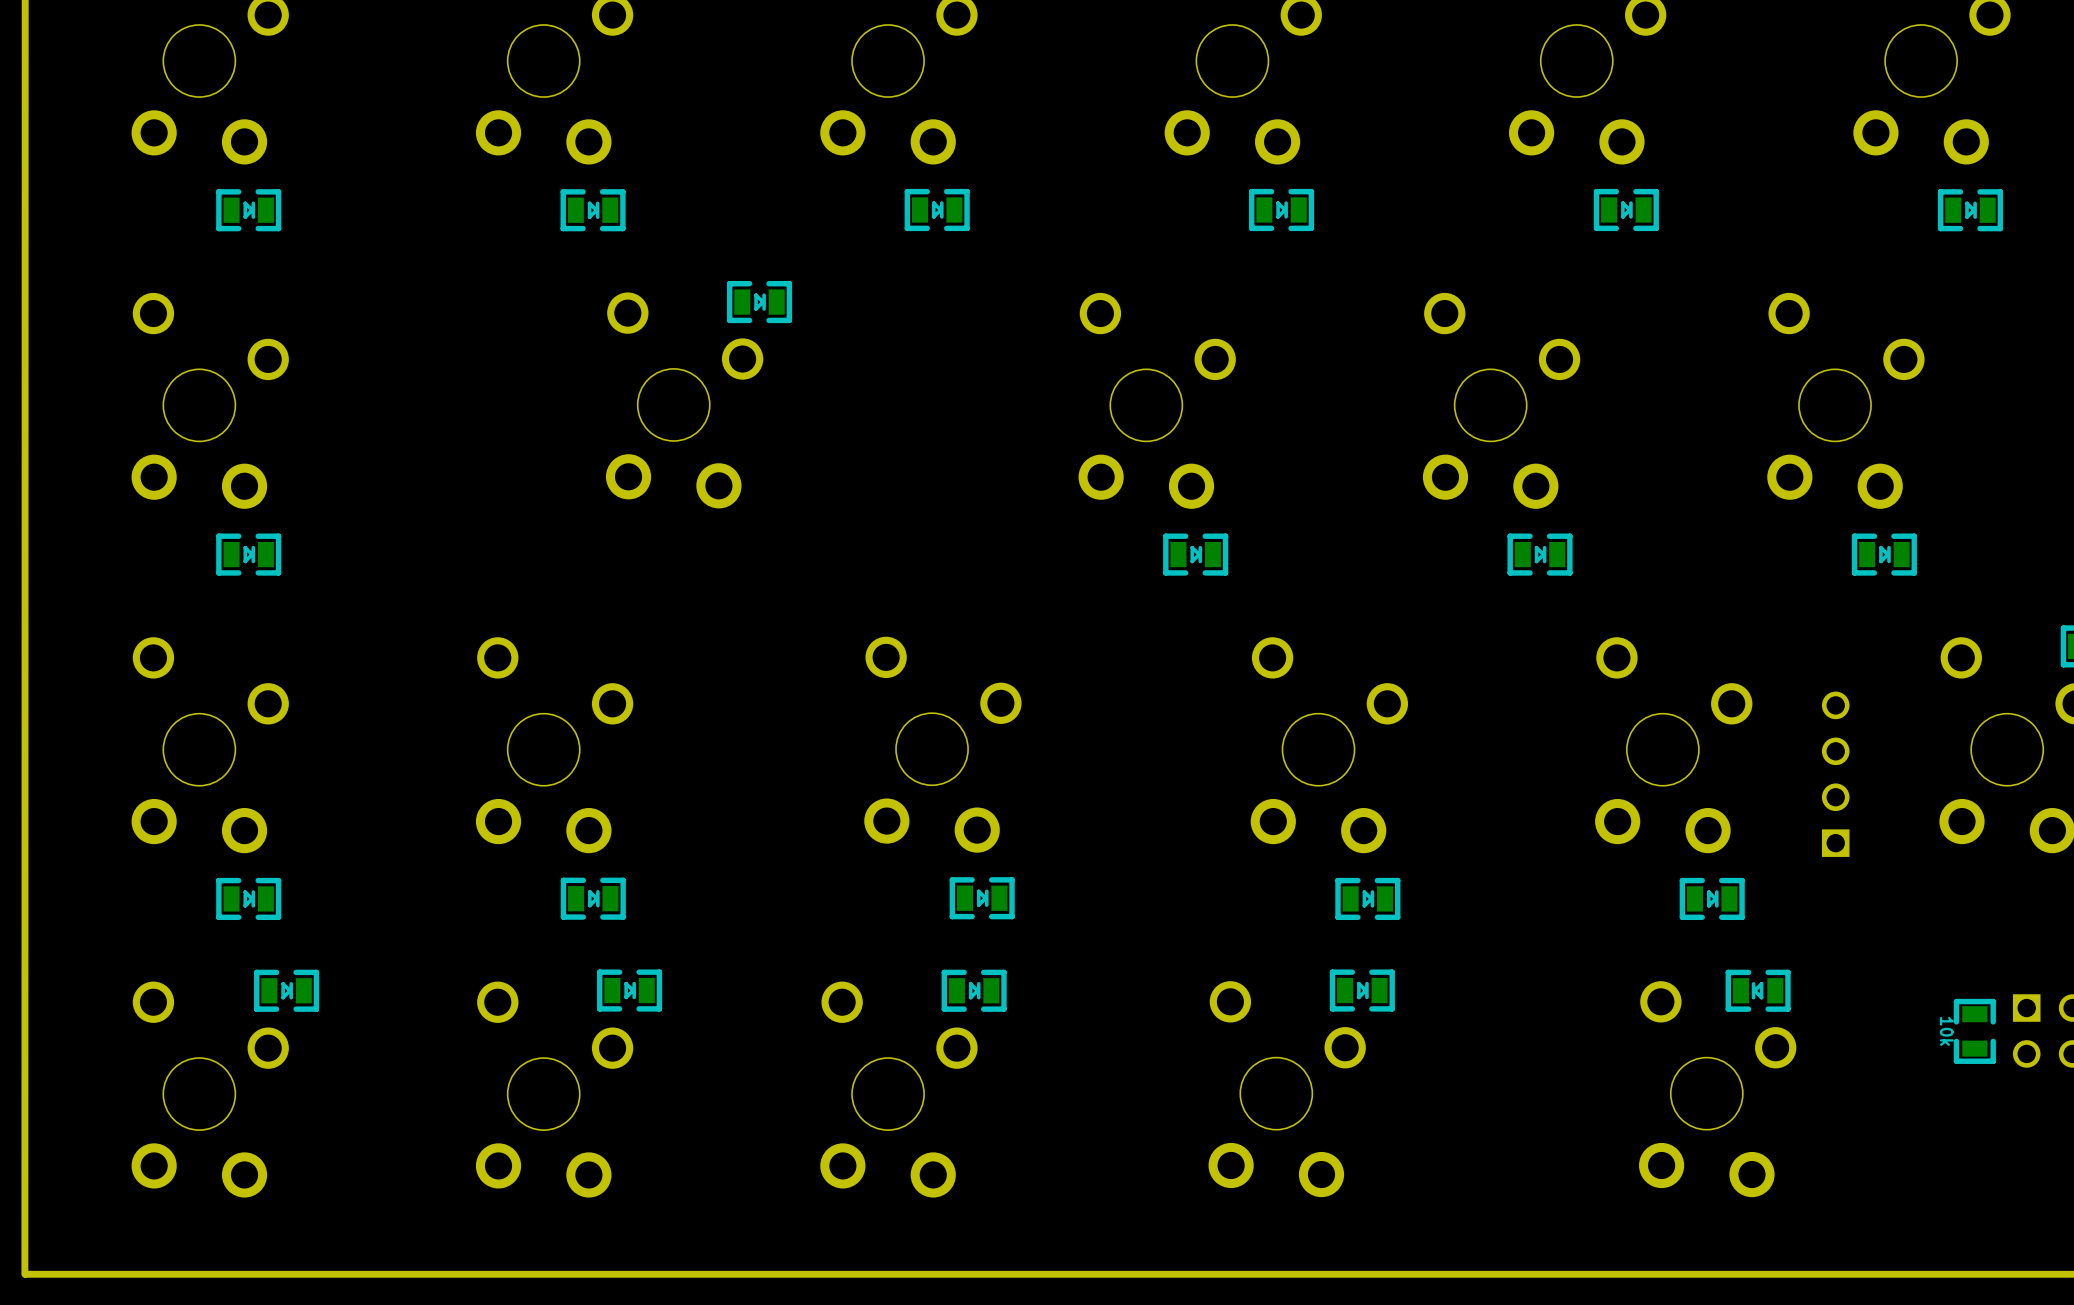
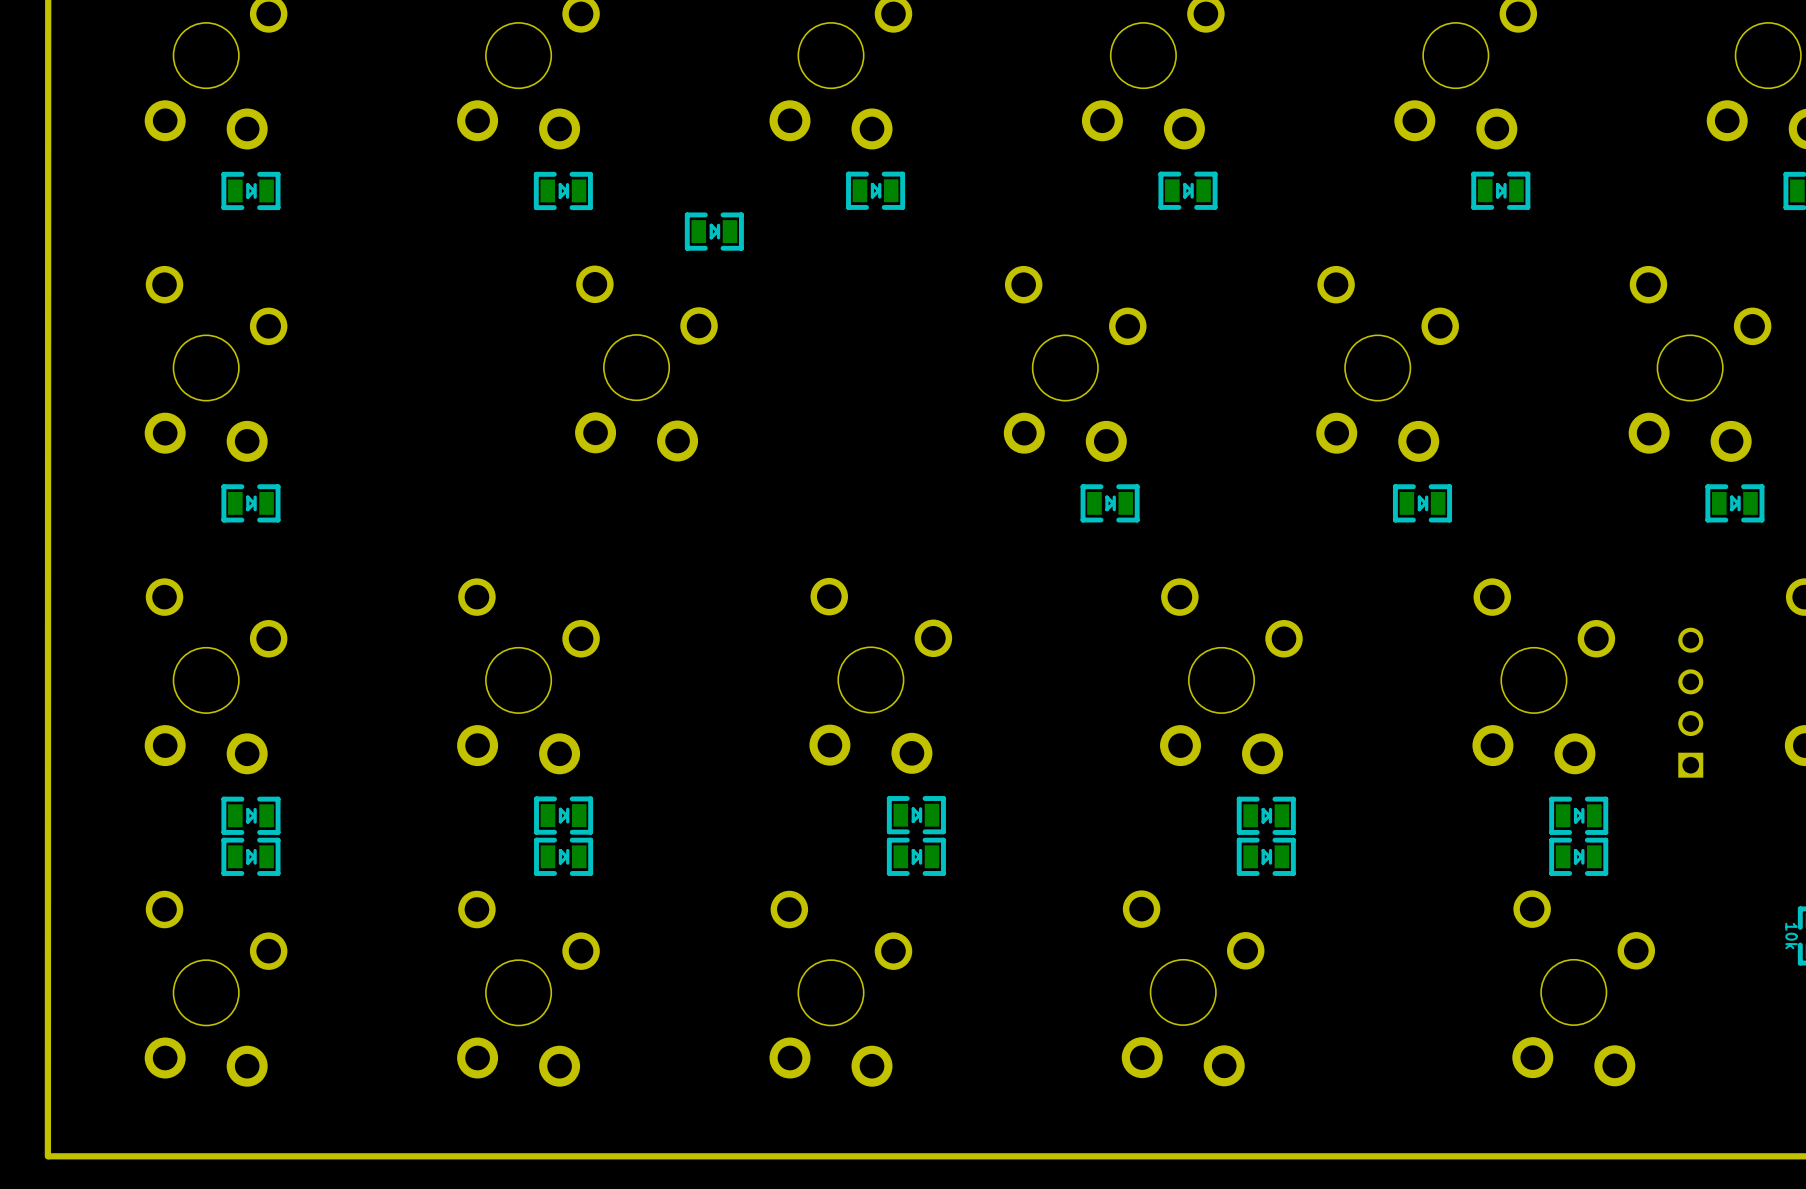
part position: (759, 302) -> (714, 231)
part position: (286, 990) -> (250, 856)
part position: (629, 990) -> (563, 856)
part position: (974, 990) -> (916, 856)
part position: (1362, 990) -> (1266, 856)
part rotation: 0° (1758, 990) -> 180° (1578, 856)
part position: (1758, 990) -> (1578, 856)

